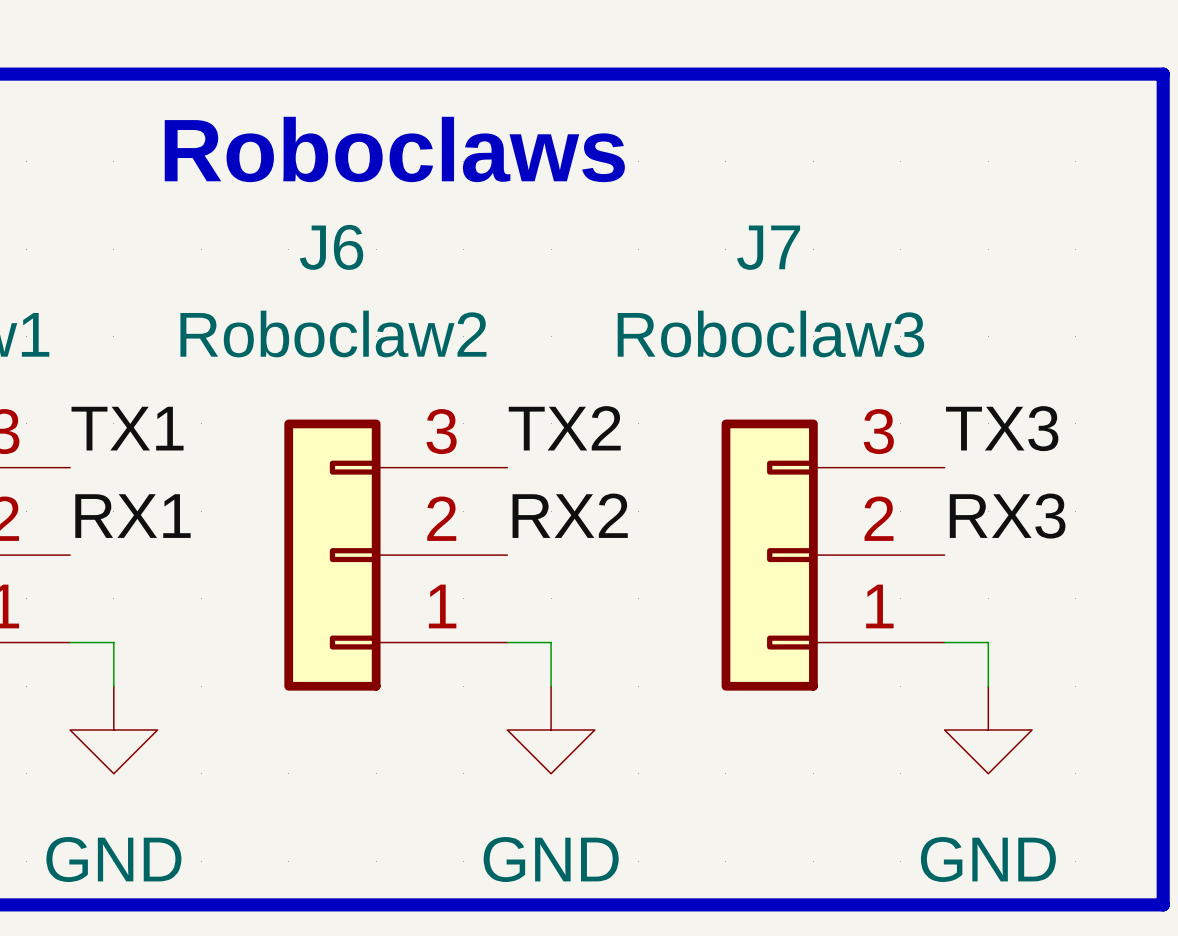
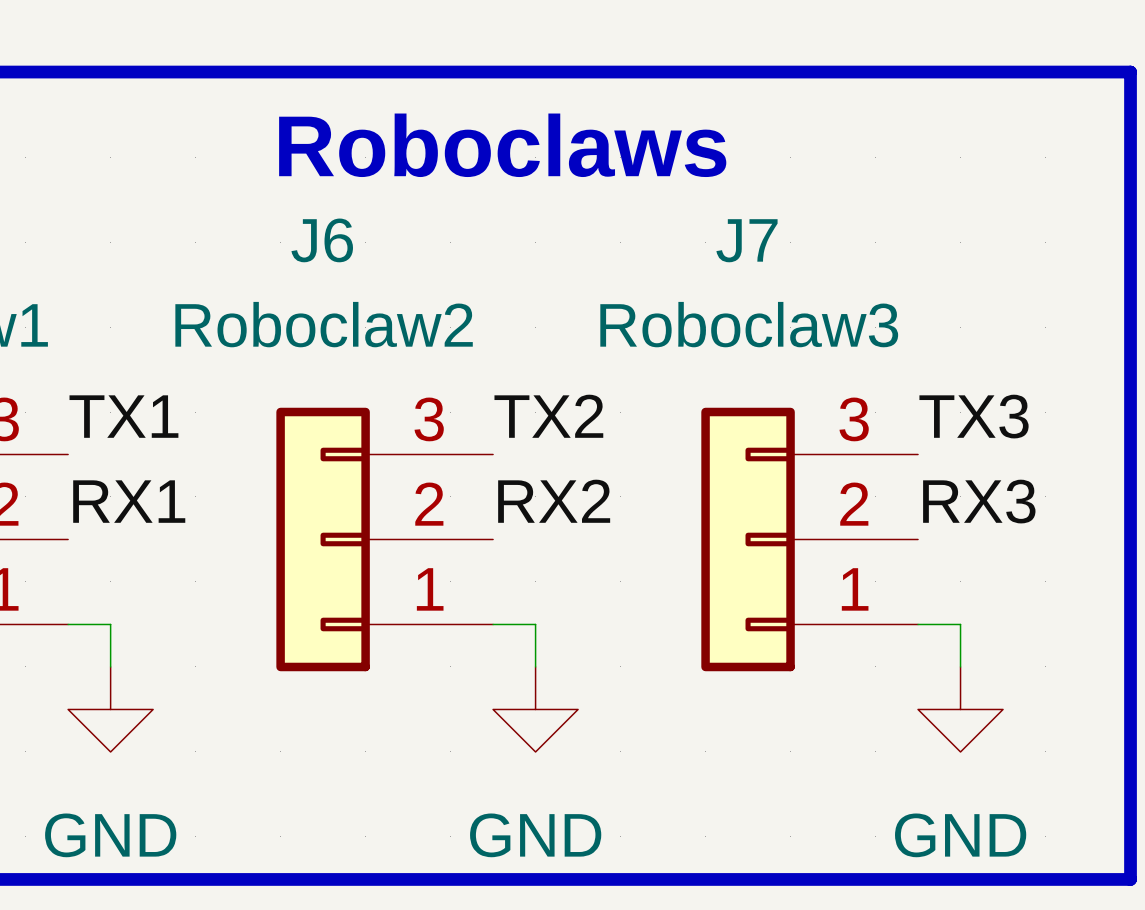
text position: Roboclaws (394, 149) -> Roboclaws (502, 145)

